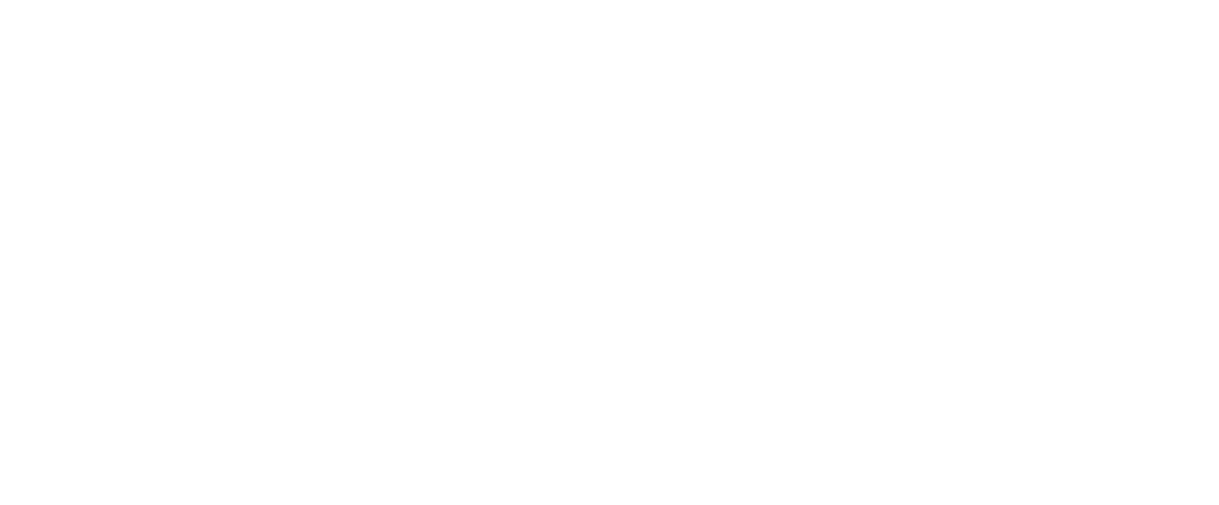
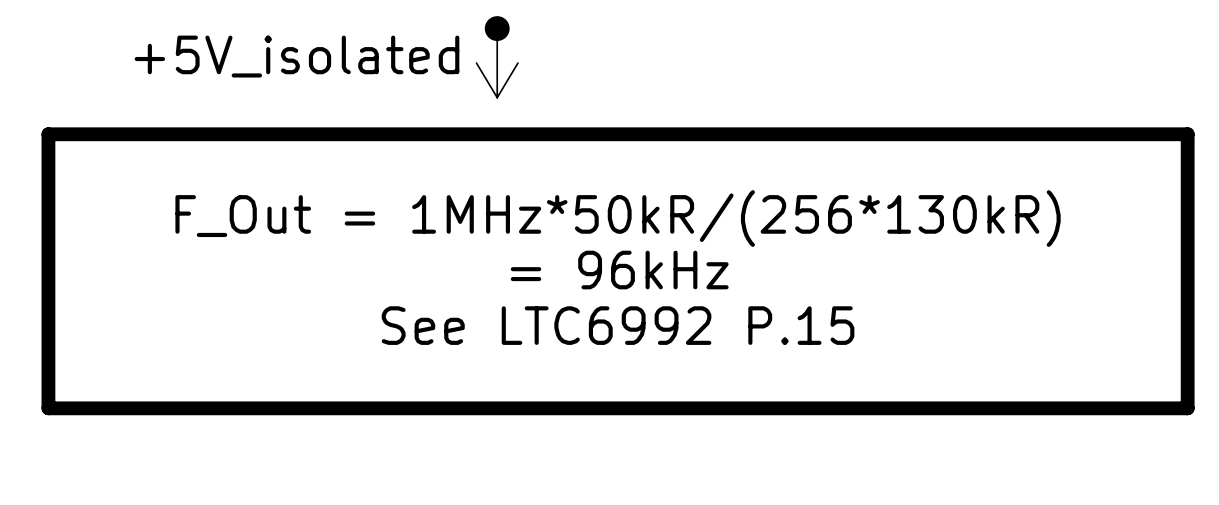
junction: none -> (497, 28)
power symbol: none -> +5V_isolated (497, 63)
line: none -> (48, 134) (1187, 134) (1187, 408) (48, 408) (48, 134)
text: none -> F_Out = 1MHz*50kR/(256*130kR) (618, 218)
text: none -> = 96kHz (619, 270)
text: none -> See LTC6992 P.15 (618, 325)

